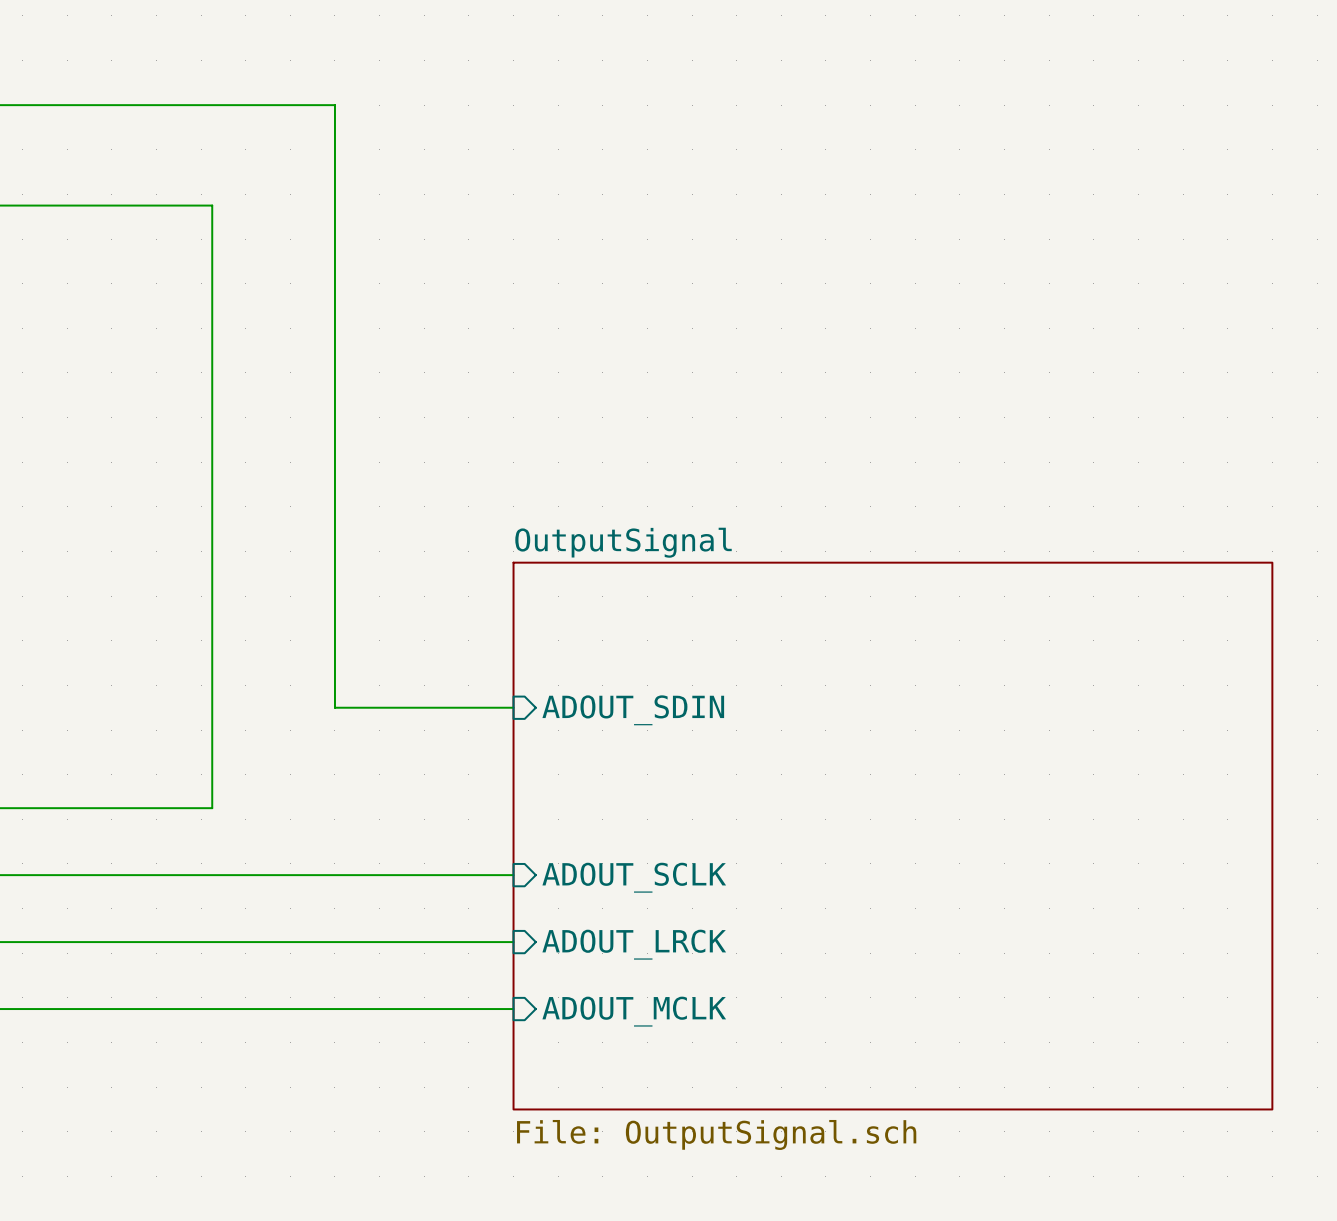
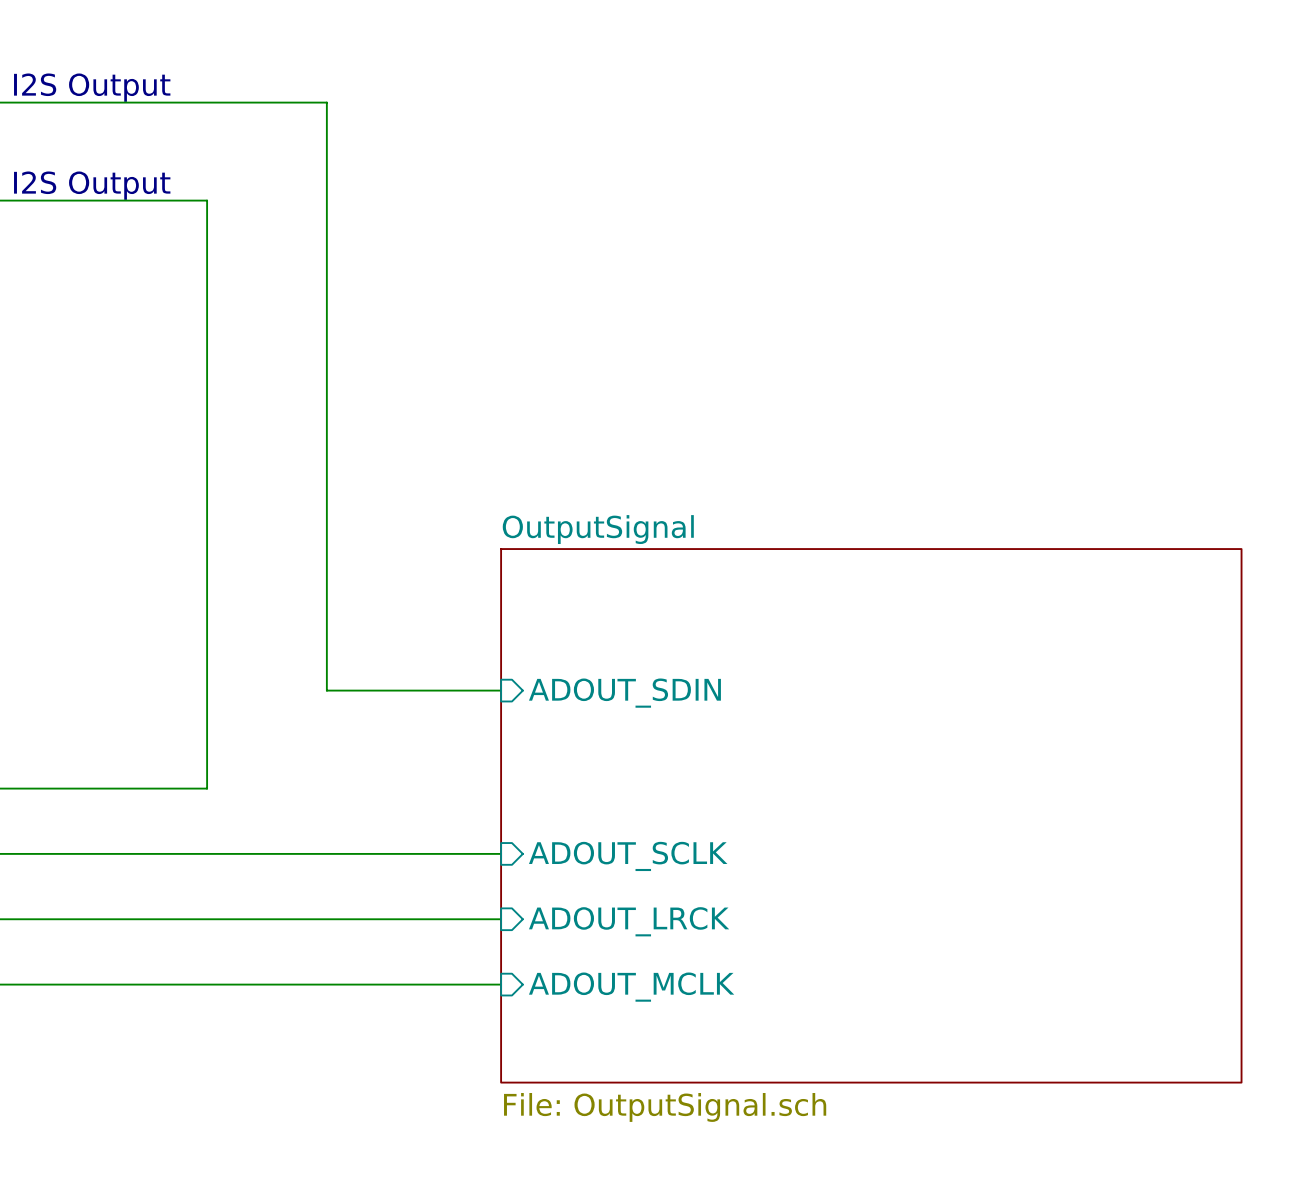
text: none -> I2S Output (92, 87)
text: none -> I2S Output (92, 185)

